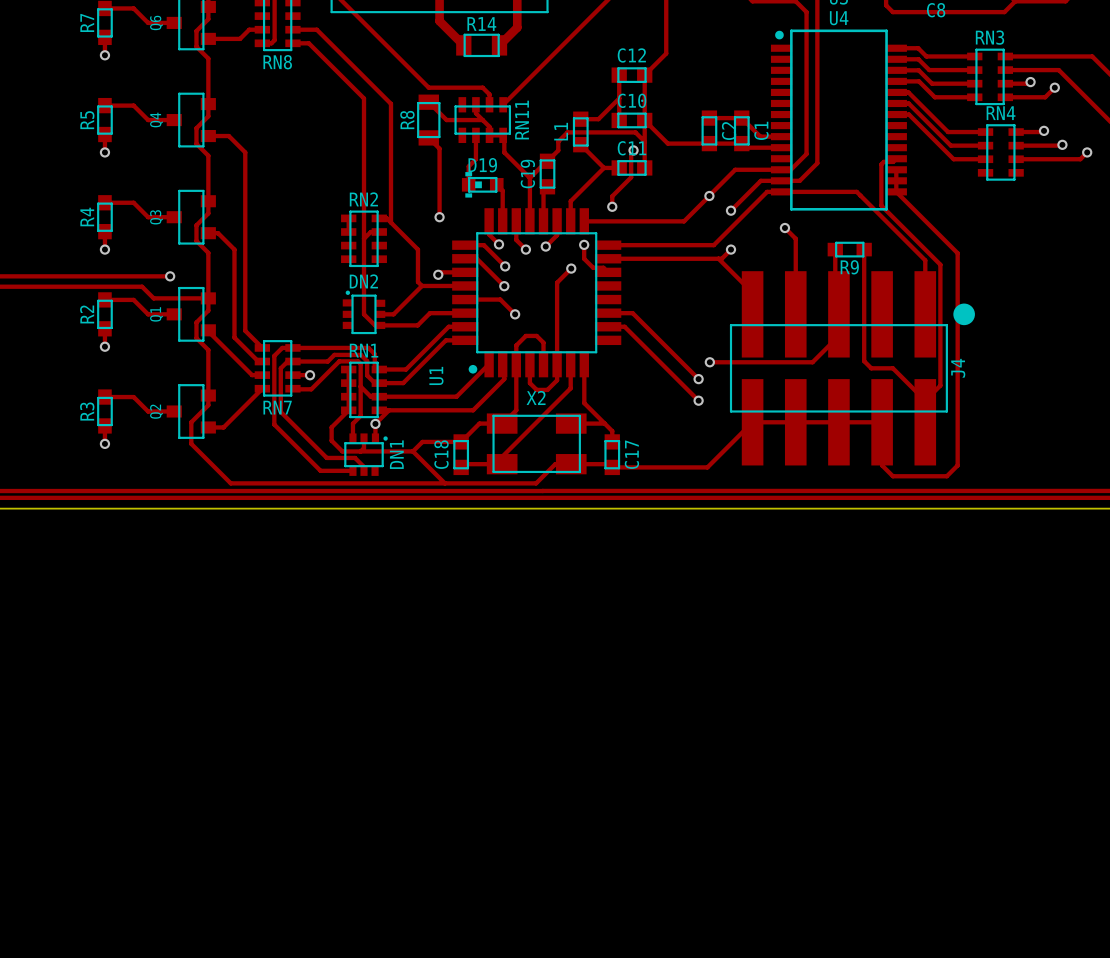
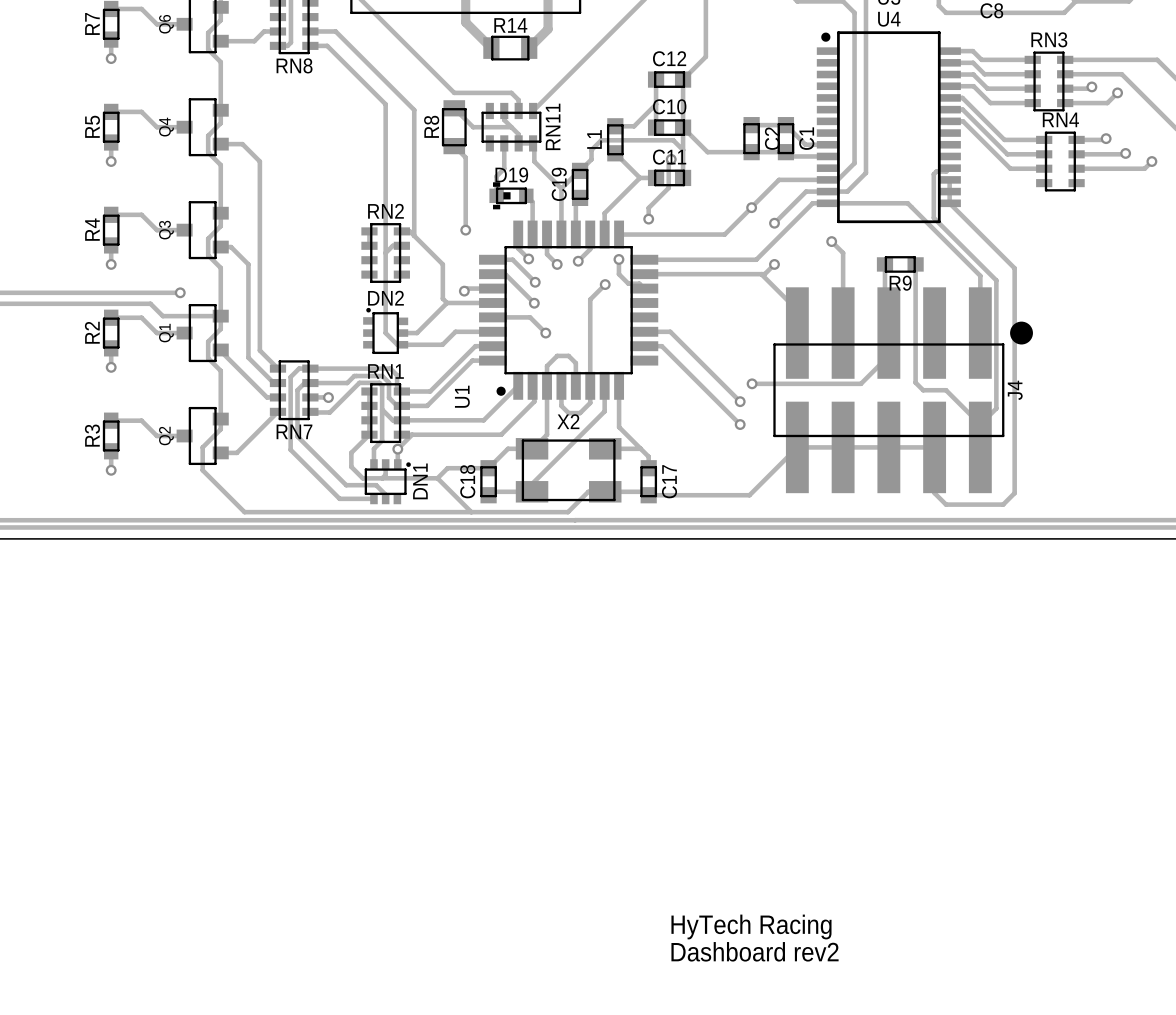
text: none -> HyTech Racing (751, 926)
text: none -> Dashboard rev2 (755, 951)

